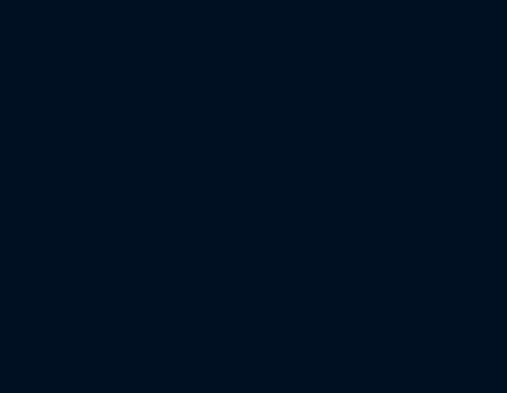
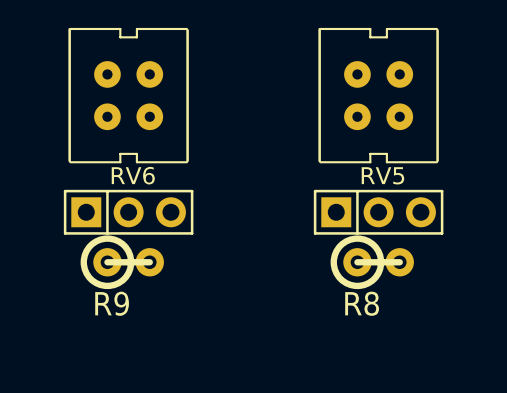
part: none -> (128, 95)
part: none -> (378, 95)
RV6: none -> (128, 212)
RV5: none -> (378, 212)
R9: none -> (122, 262)
R8: none -> (372, 262)

